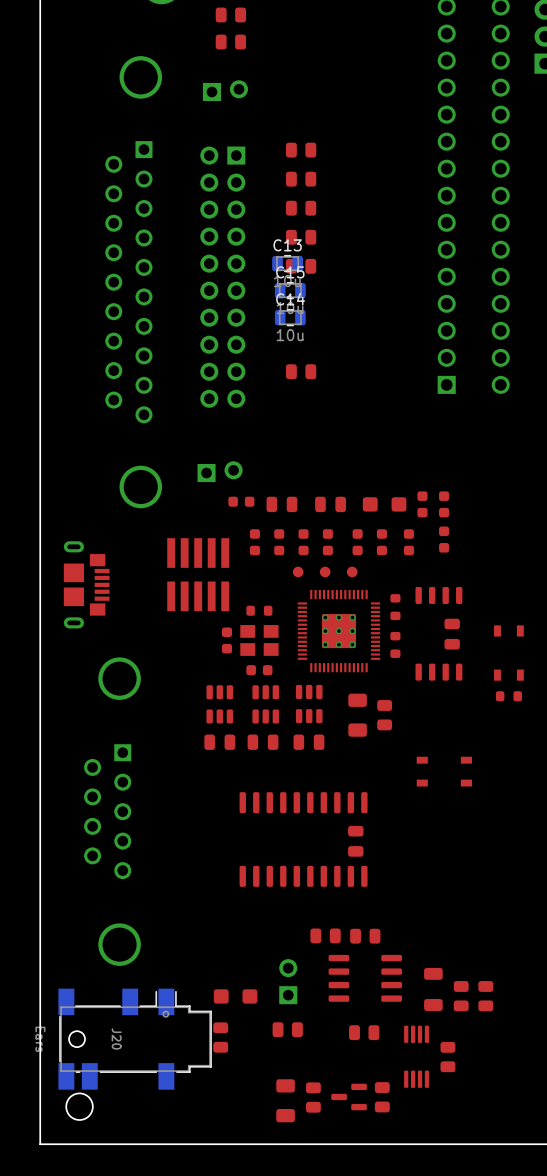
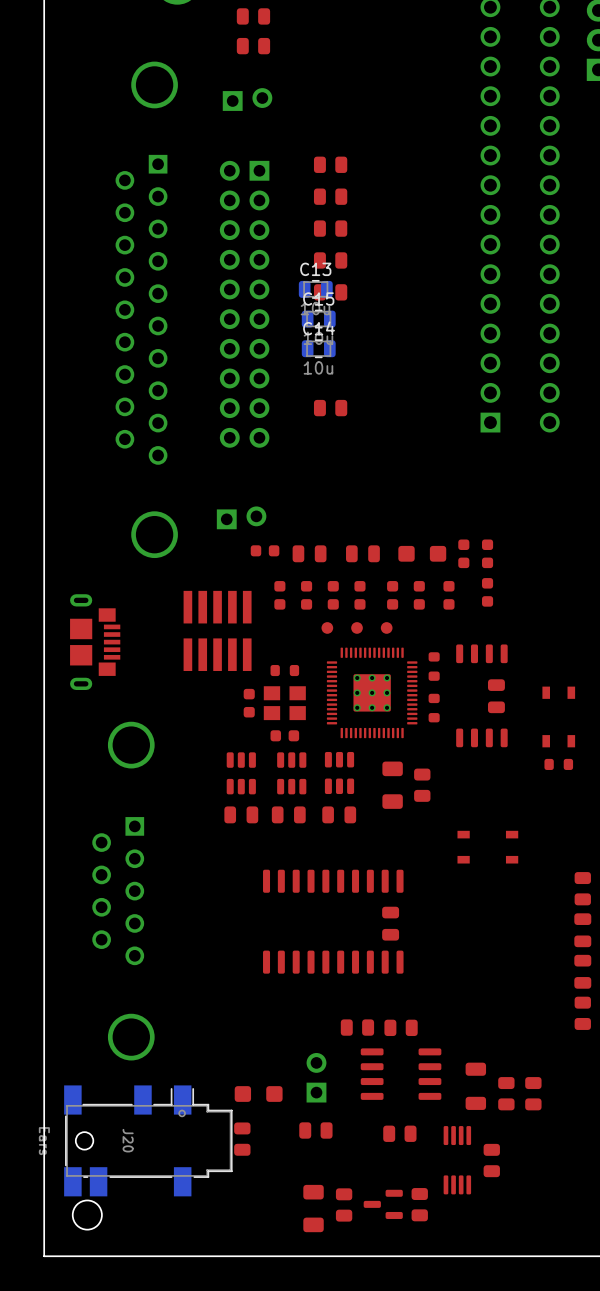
part: none -> (582, 888)
part: none -> (582, 930)
part: none -> (582, 971)
part: none -> (582, 1013)

